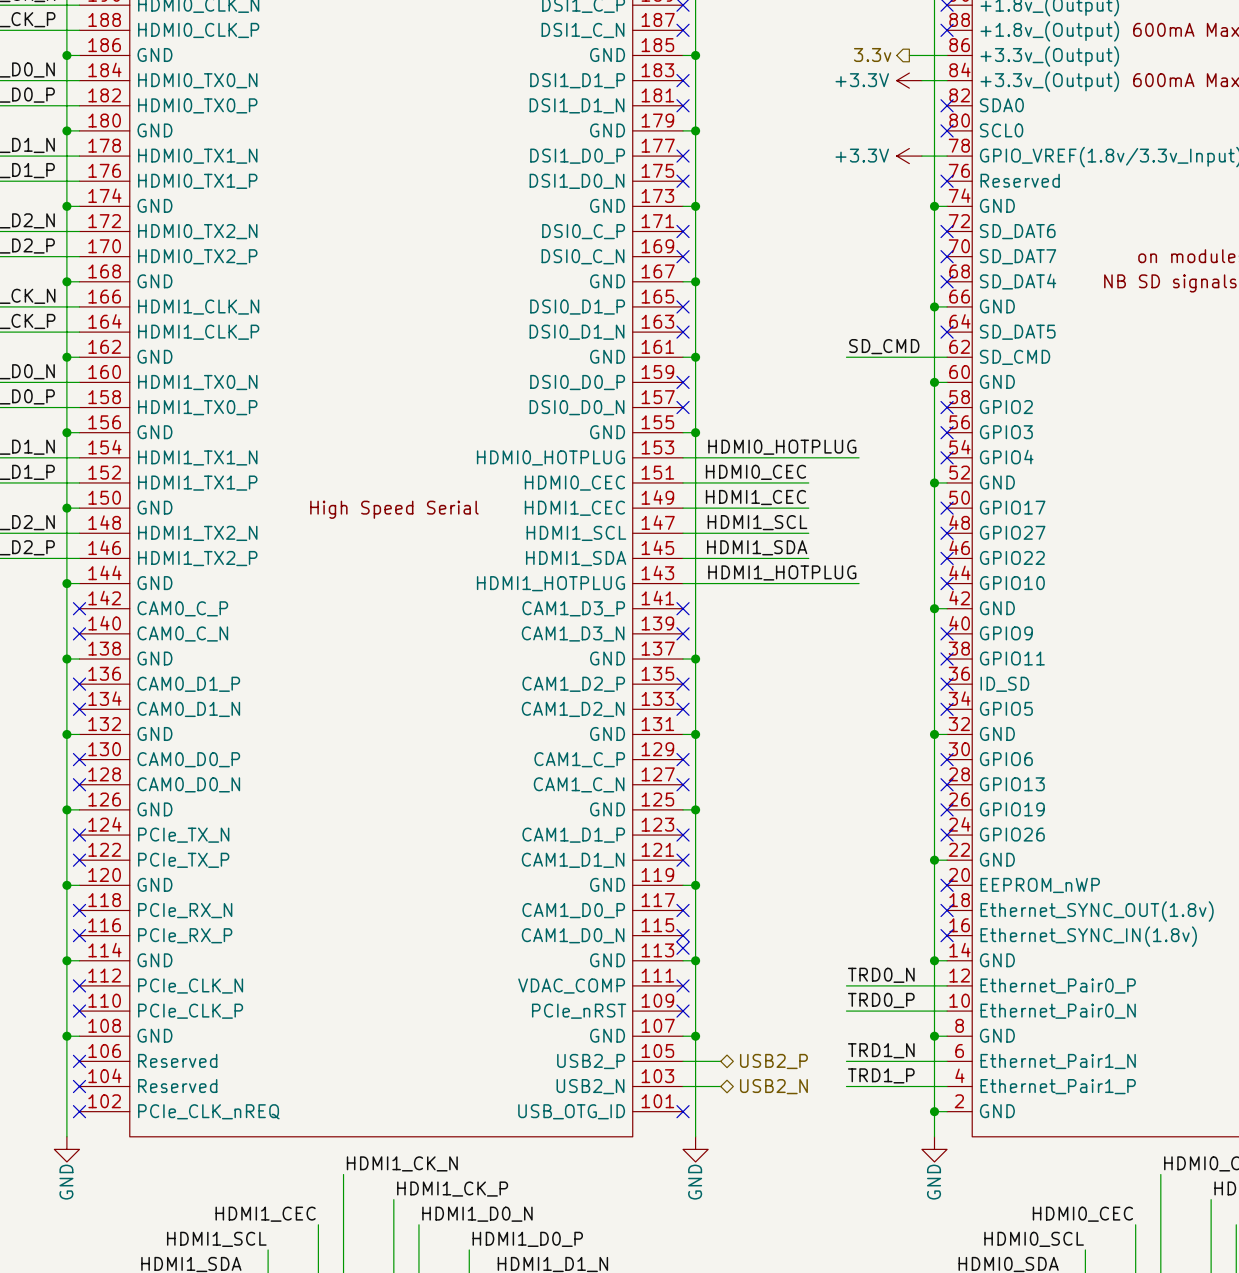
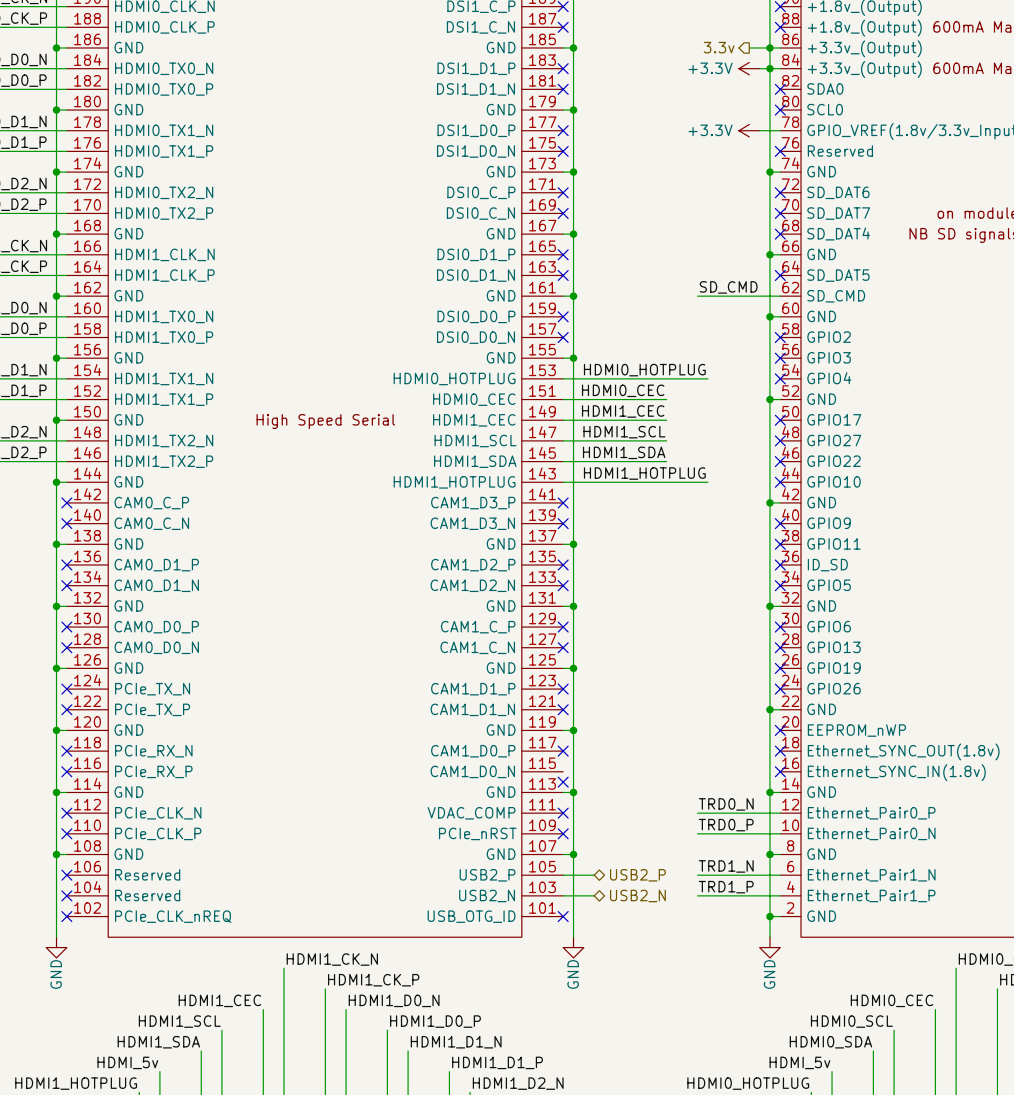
junction: none -> (769, 47)
junction: none -> (769, 68)
no-connect mark: (683, 935) -> none

